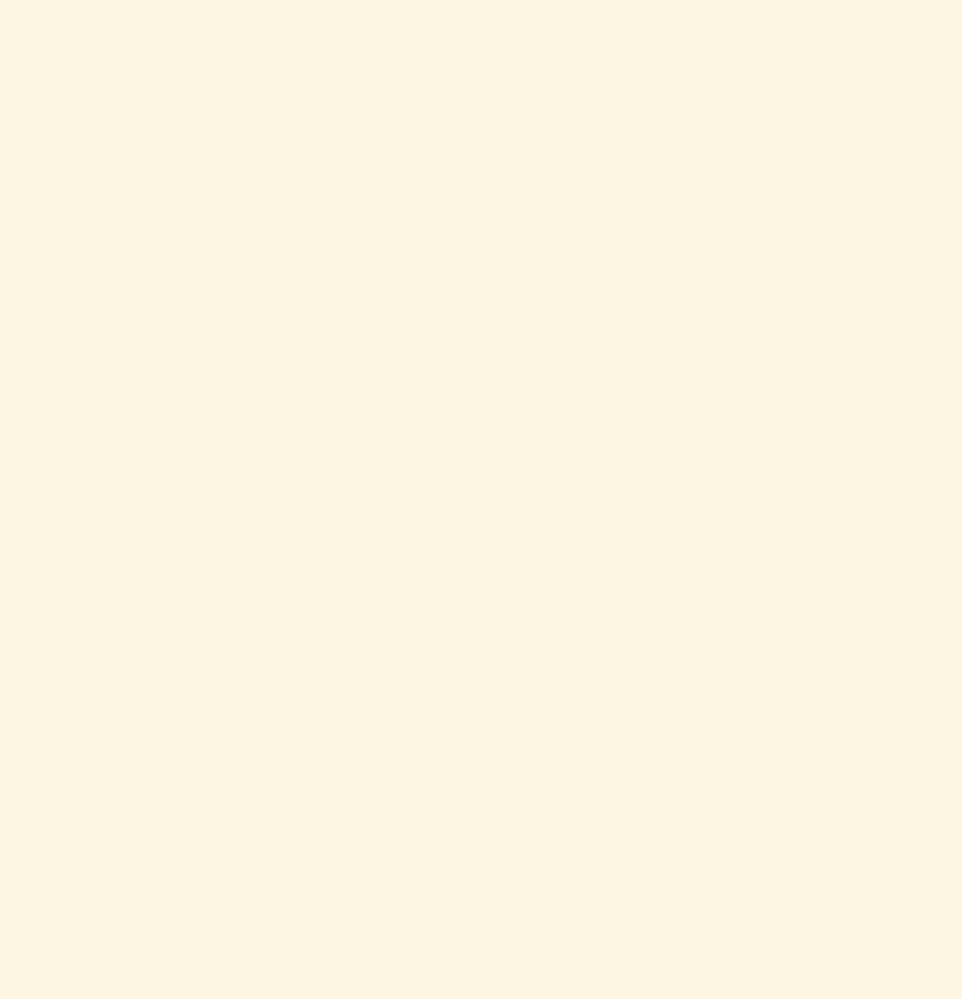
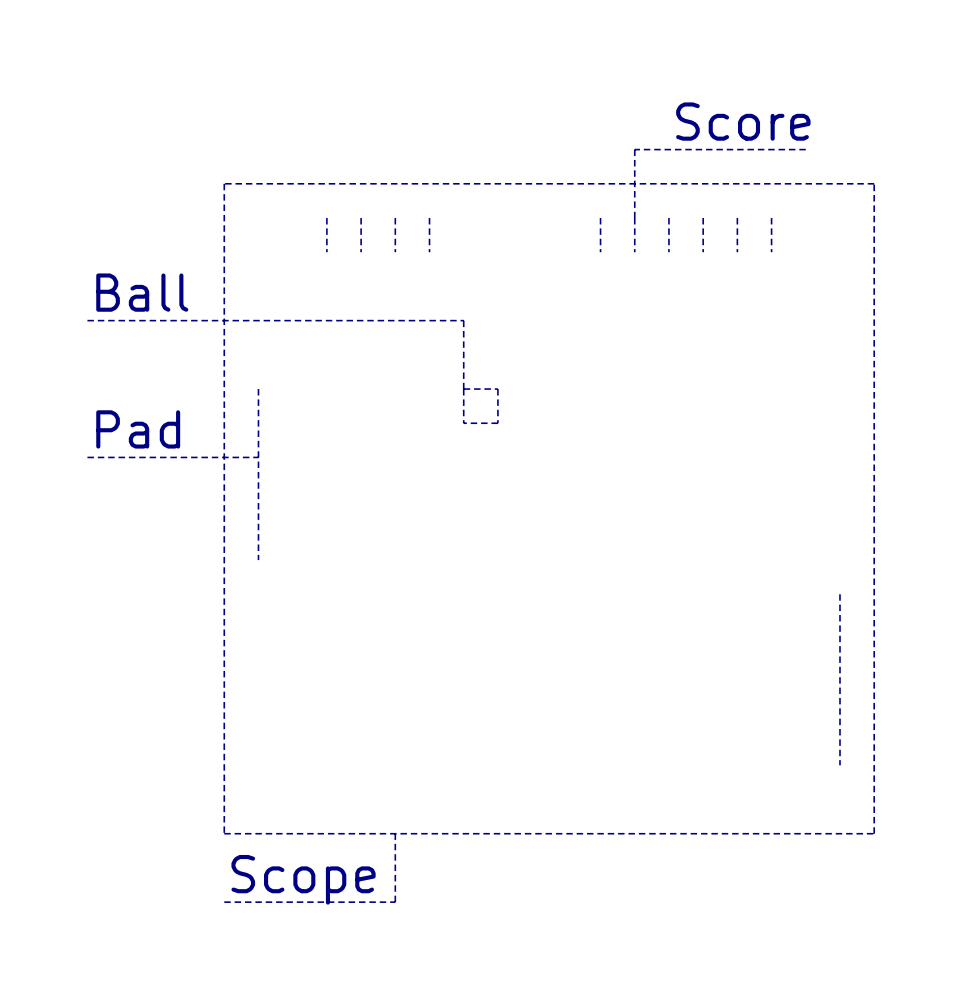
text: none -> Score (743, 121)
line: none -> (805, 149) (634, 149) (634, 252)
line: none -> (224, 183) (874, 183) (874, 833) (224, 833) (224, 183)
line: none -> (326, 218) (326, 252)
line: none -> (361, 218) (361, 252)
line: none -> (395, 218) (395, 252)
line: none -> (429, 218) (429, 252)
line: none -> (600, 218) (600, 252)
line: none -> (668, 218) (668, 252)
line: none -> (703, 218) (703, 252)
line: none -> (737, 218) (737, 252)
line: none -> (771, 218) (771, 252)
text: none -> Ball (142, 292)
line: none -> (87, 320) (463, 320) (463, 423) (497, 423) (497, 389) (463, 389)
line: none -> (258, 389) (258, 560)
text: none -> Pad (138, 429)
line: none -> (87, 457) (258, 457)
line: none -> (839, 594) (839, 765)
line: none -> (395, 833) (395, 902) (224, 902)
text: none -> Scope (303, 879)

